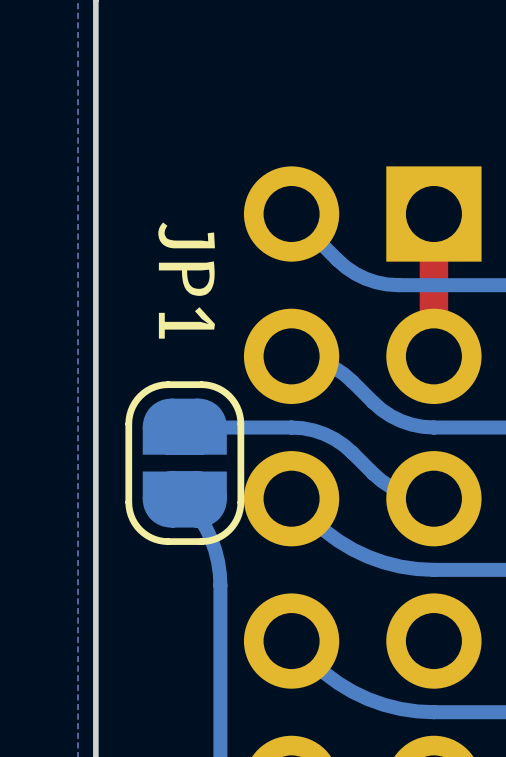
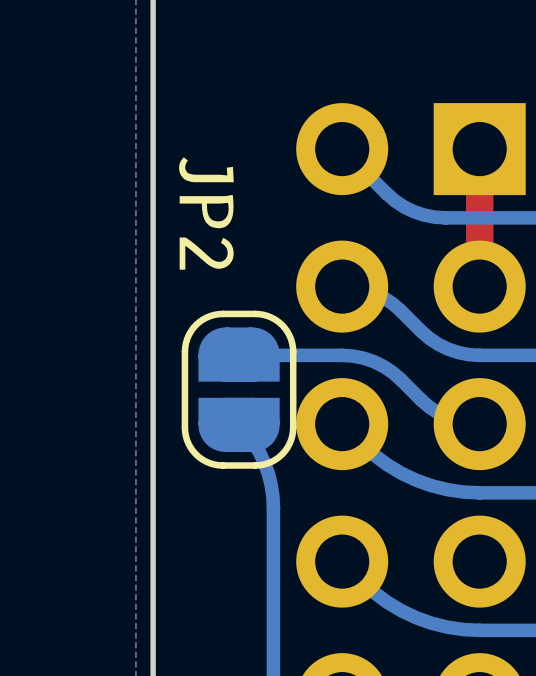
JP1 name: JP1 (186, 280) -> JP2 (206, 213)

